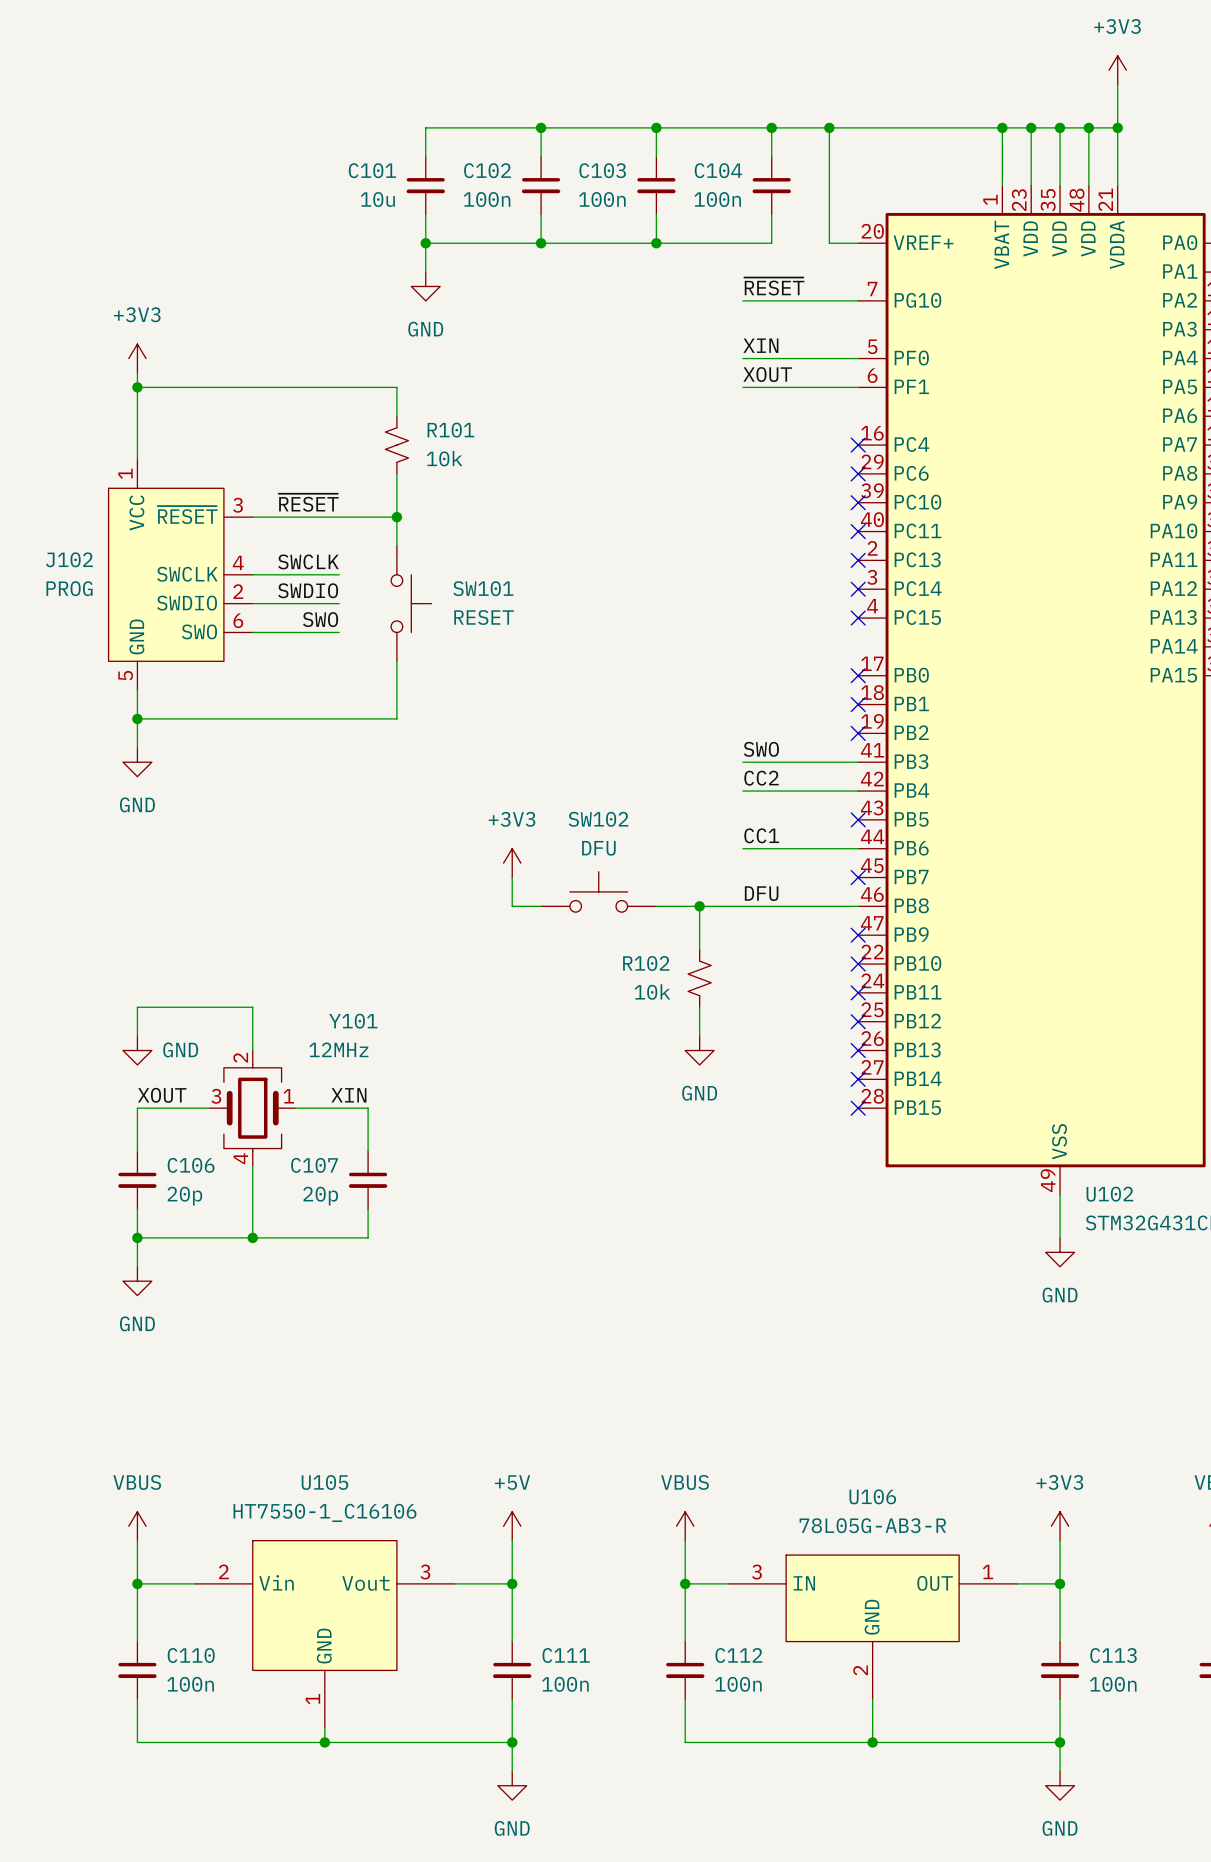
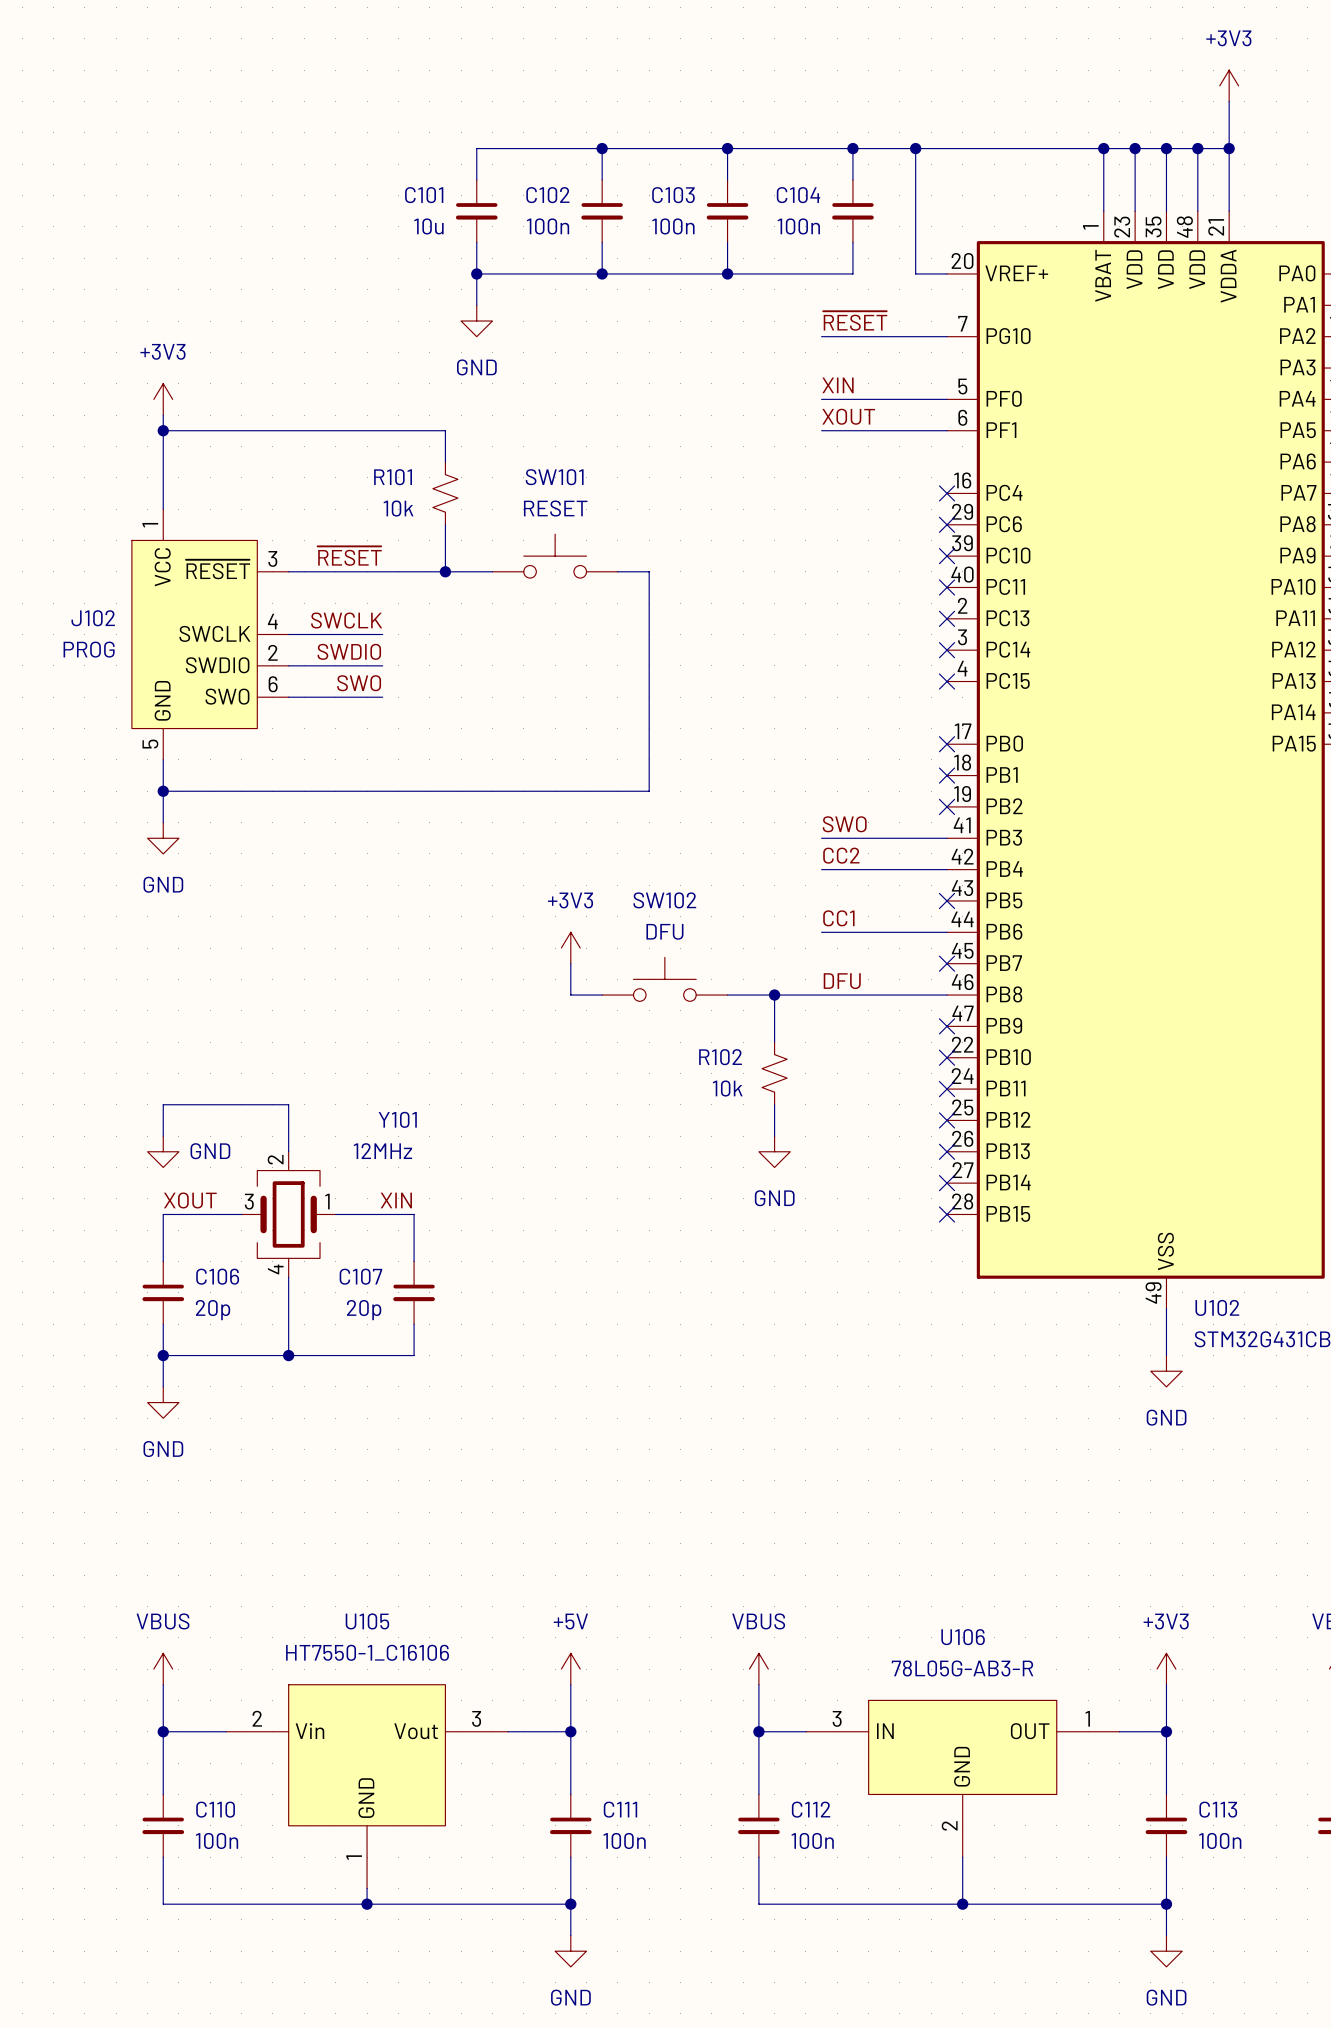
R101 flip: as is (396, 445) -> left-right (445, 493)
wire: (396, 517) (396, 545) -> (445, 571) (492, 571)
SW101 rotation: 0° (411, 603) -> 90° counterclockwise (555, 556)
SW101 position: (411, 603) -> (555, 556)
SW101 value position: RESET (484, 617) -> RESET (555, 508)
wire: (396, 661) (396, 718) -> (617, 571) (649, 571) (649, 791) (445, 791)

